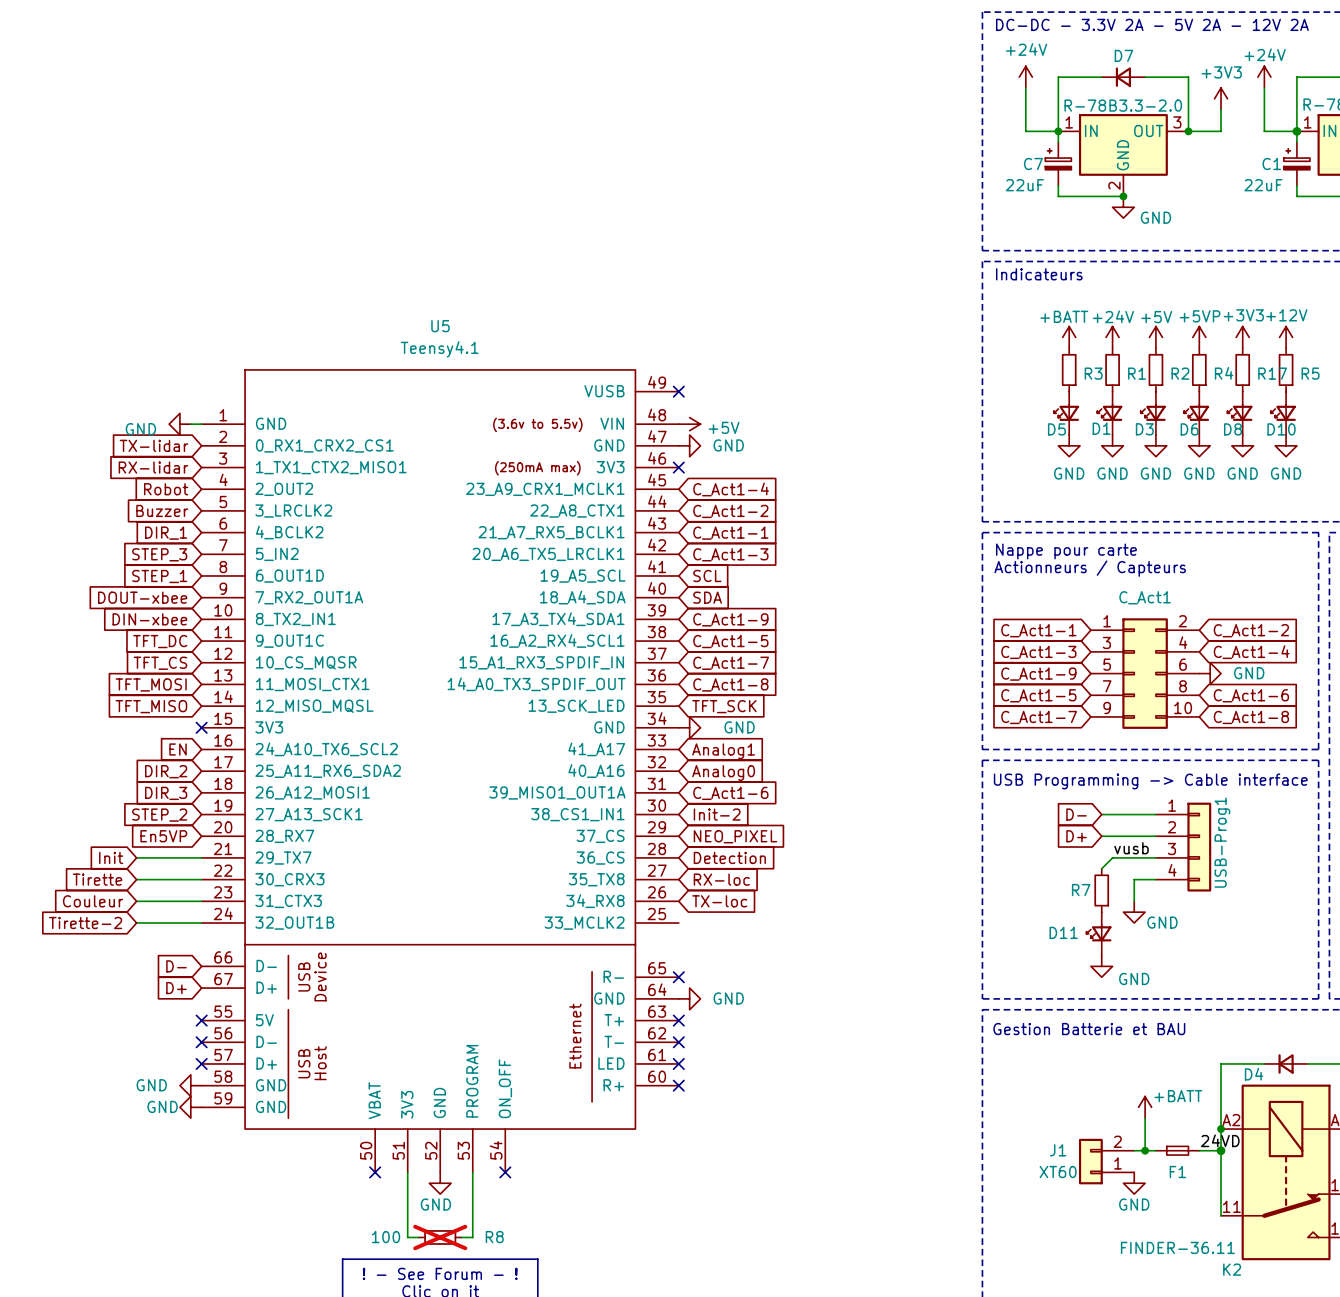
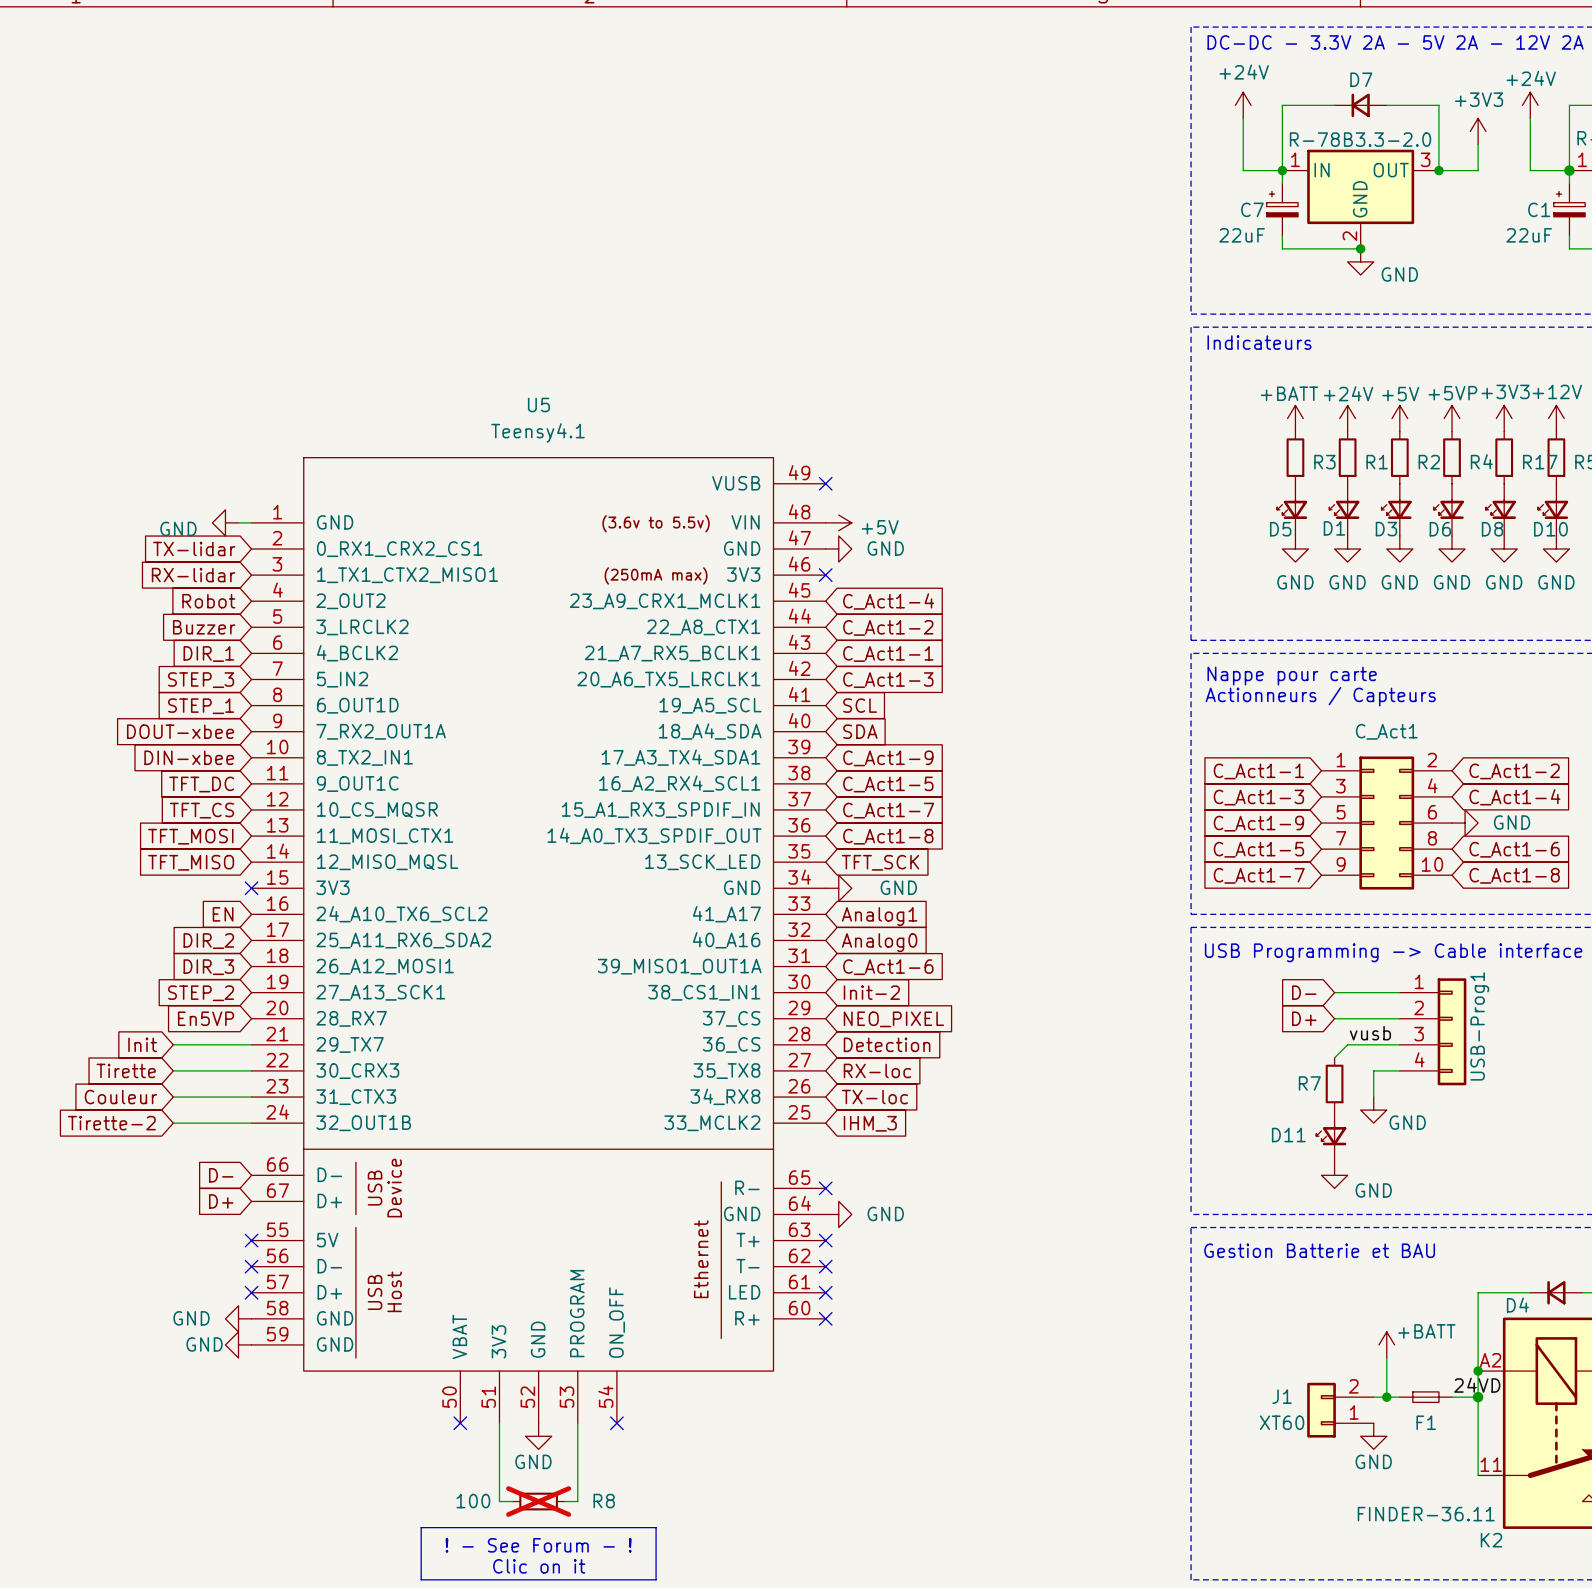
global label: none -> IHM_3 (870, 1123)

